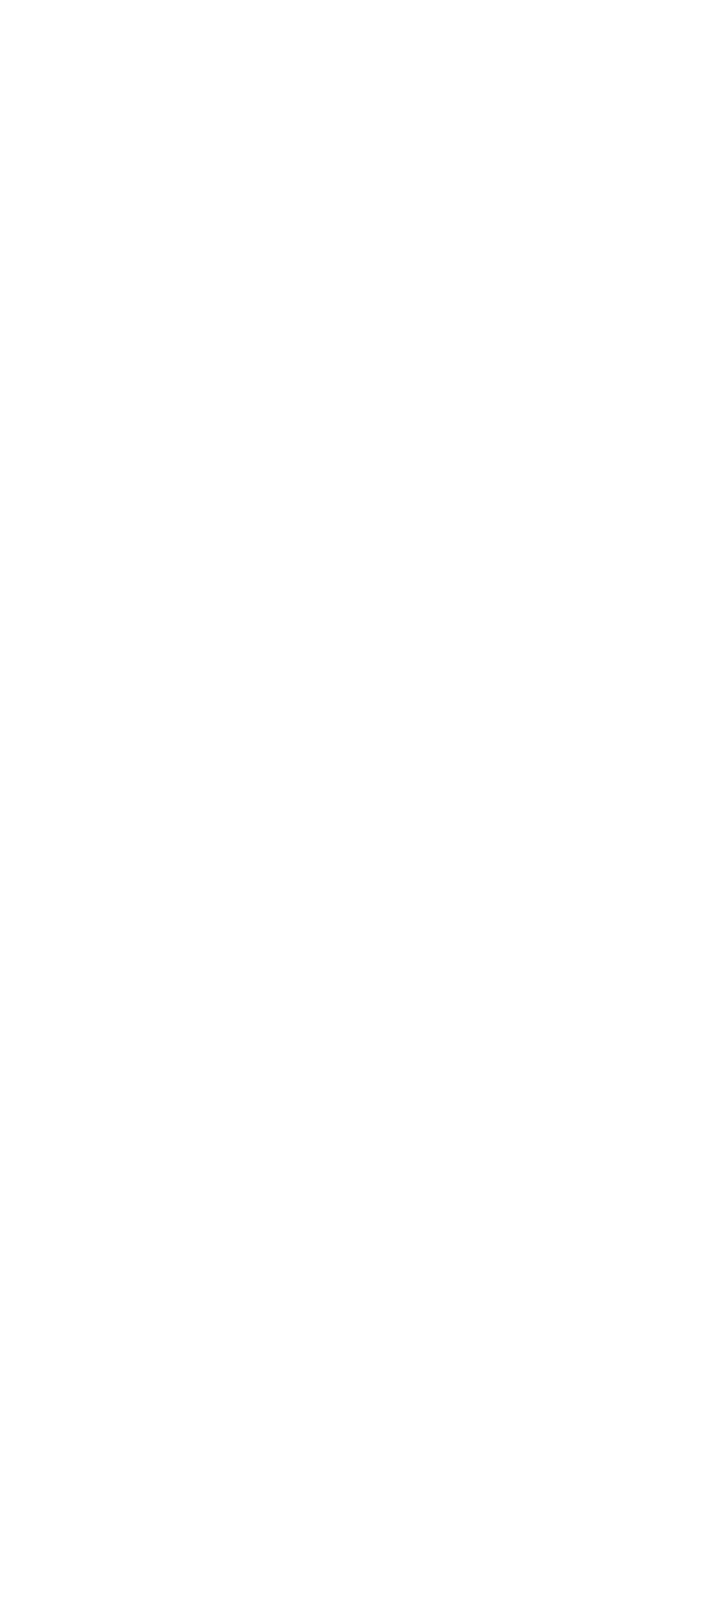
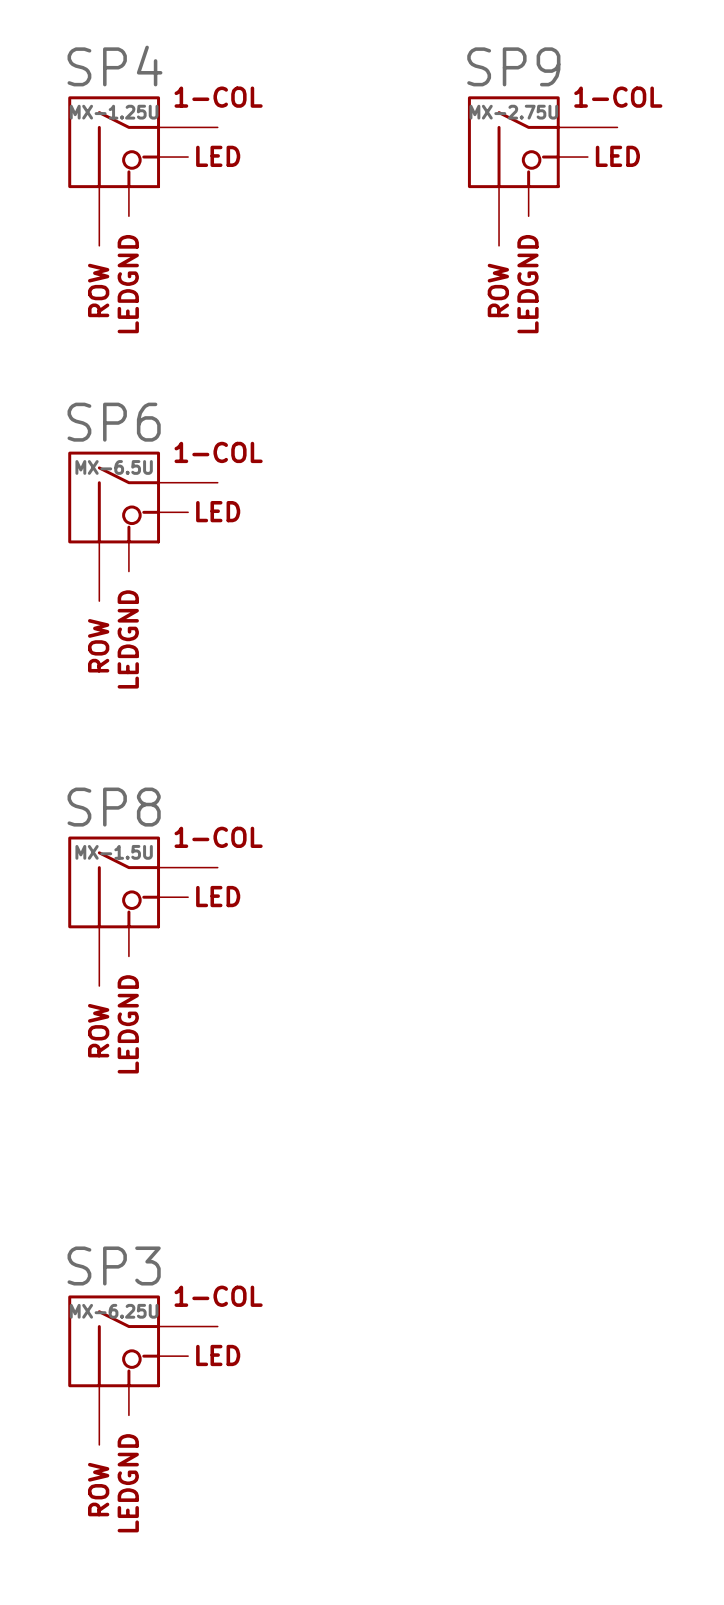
SP4: none -> MX-1.25U (142, 171)
SP9: none -> MX-2.75U (542, 171)
SP6: none -> MX-6.5U (142, 526)
SP8: none -> MX-1.5U (142, 911)
SP3: none -> MX-6.25U (142, 1370)

